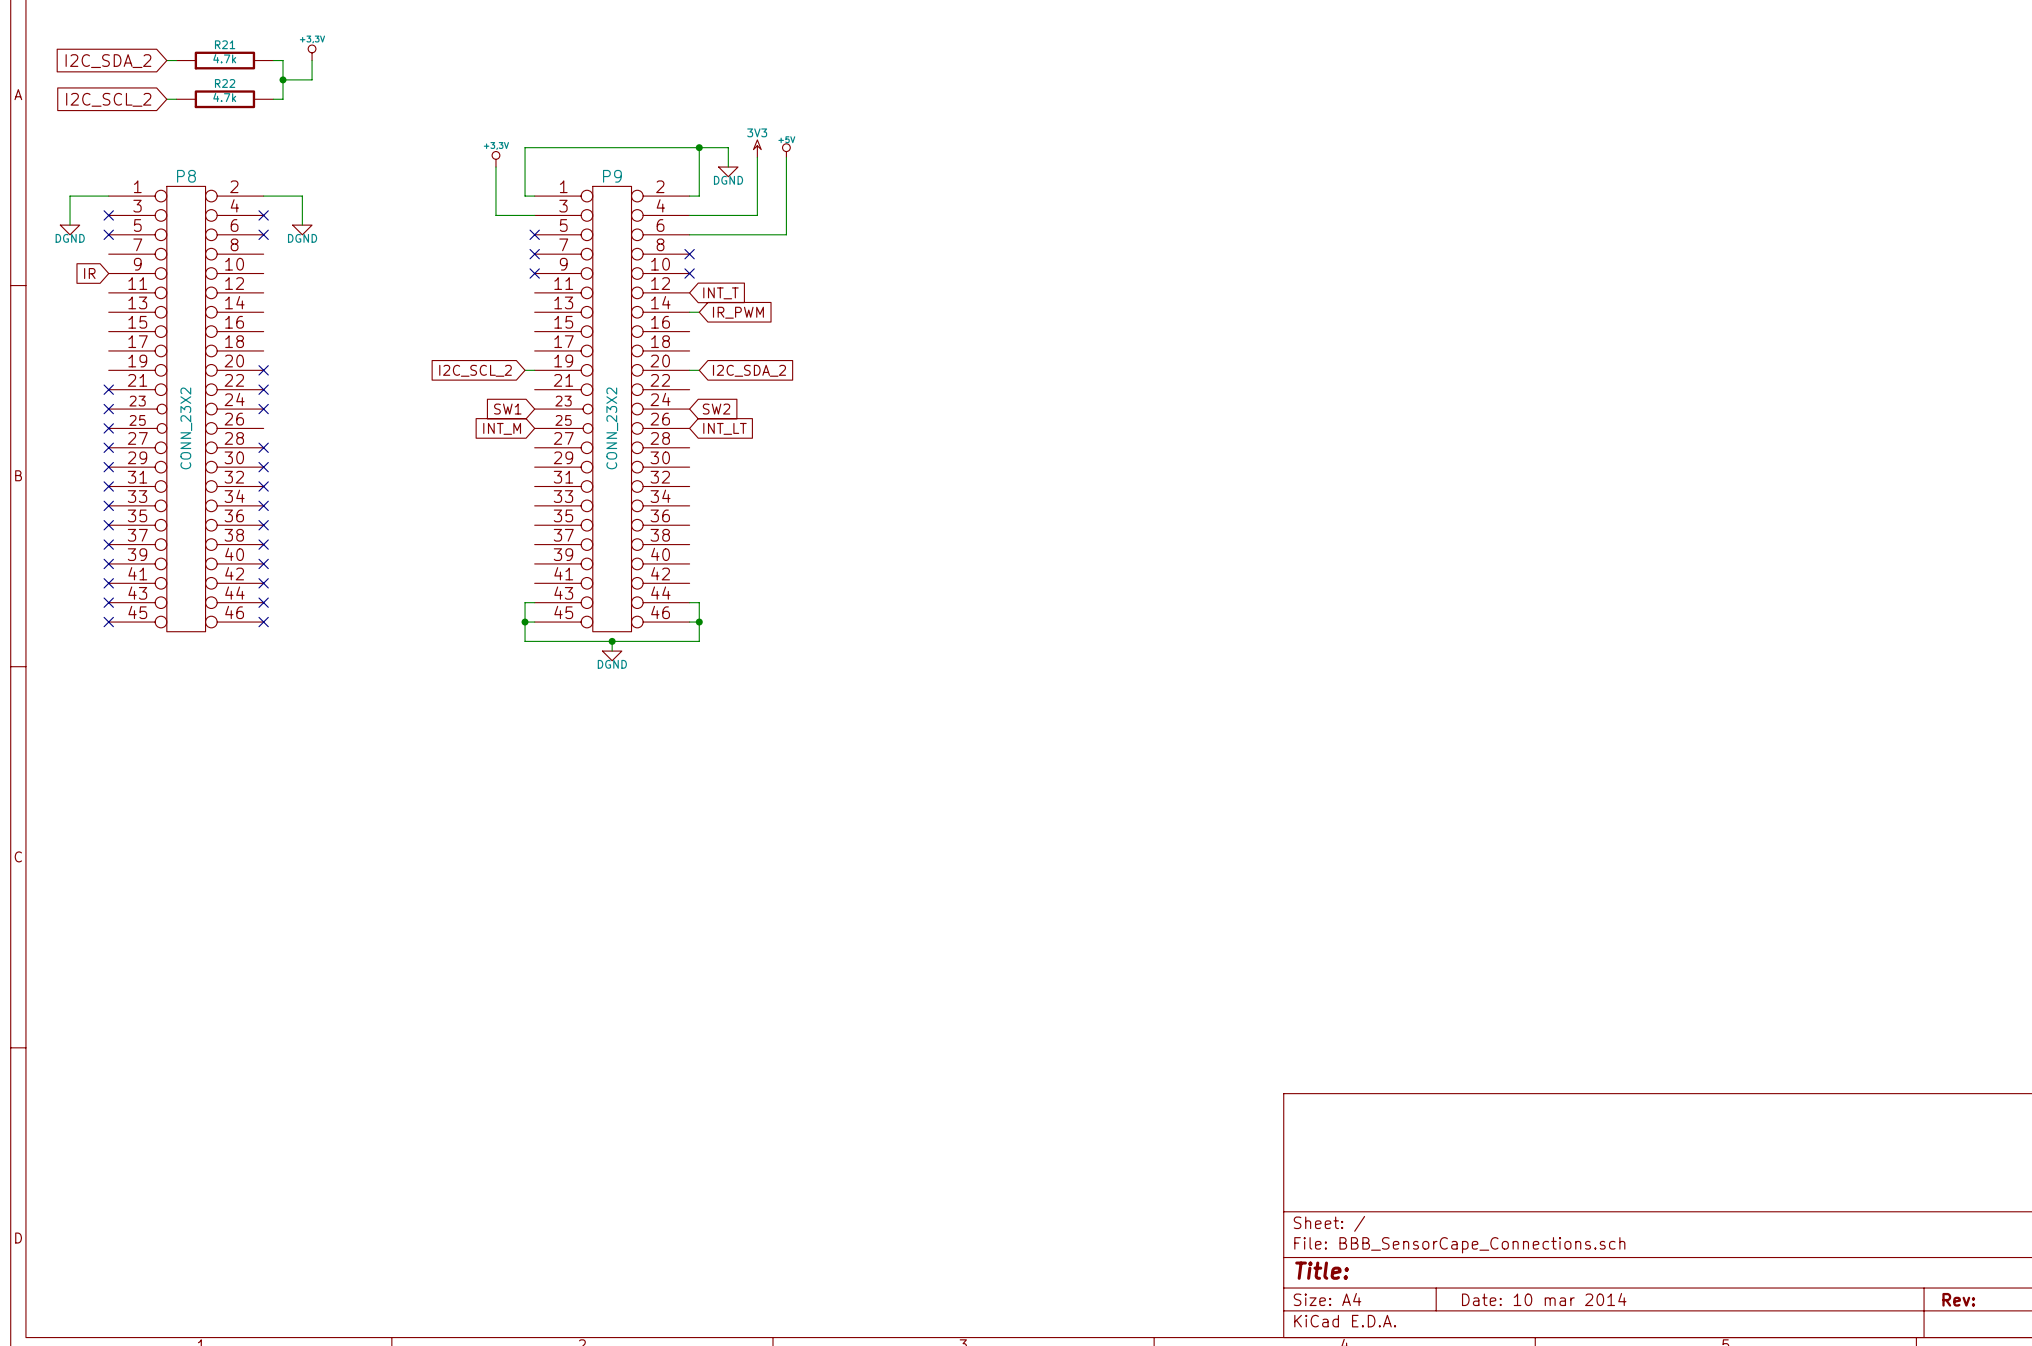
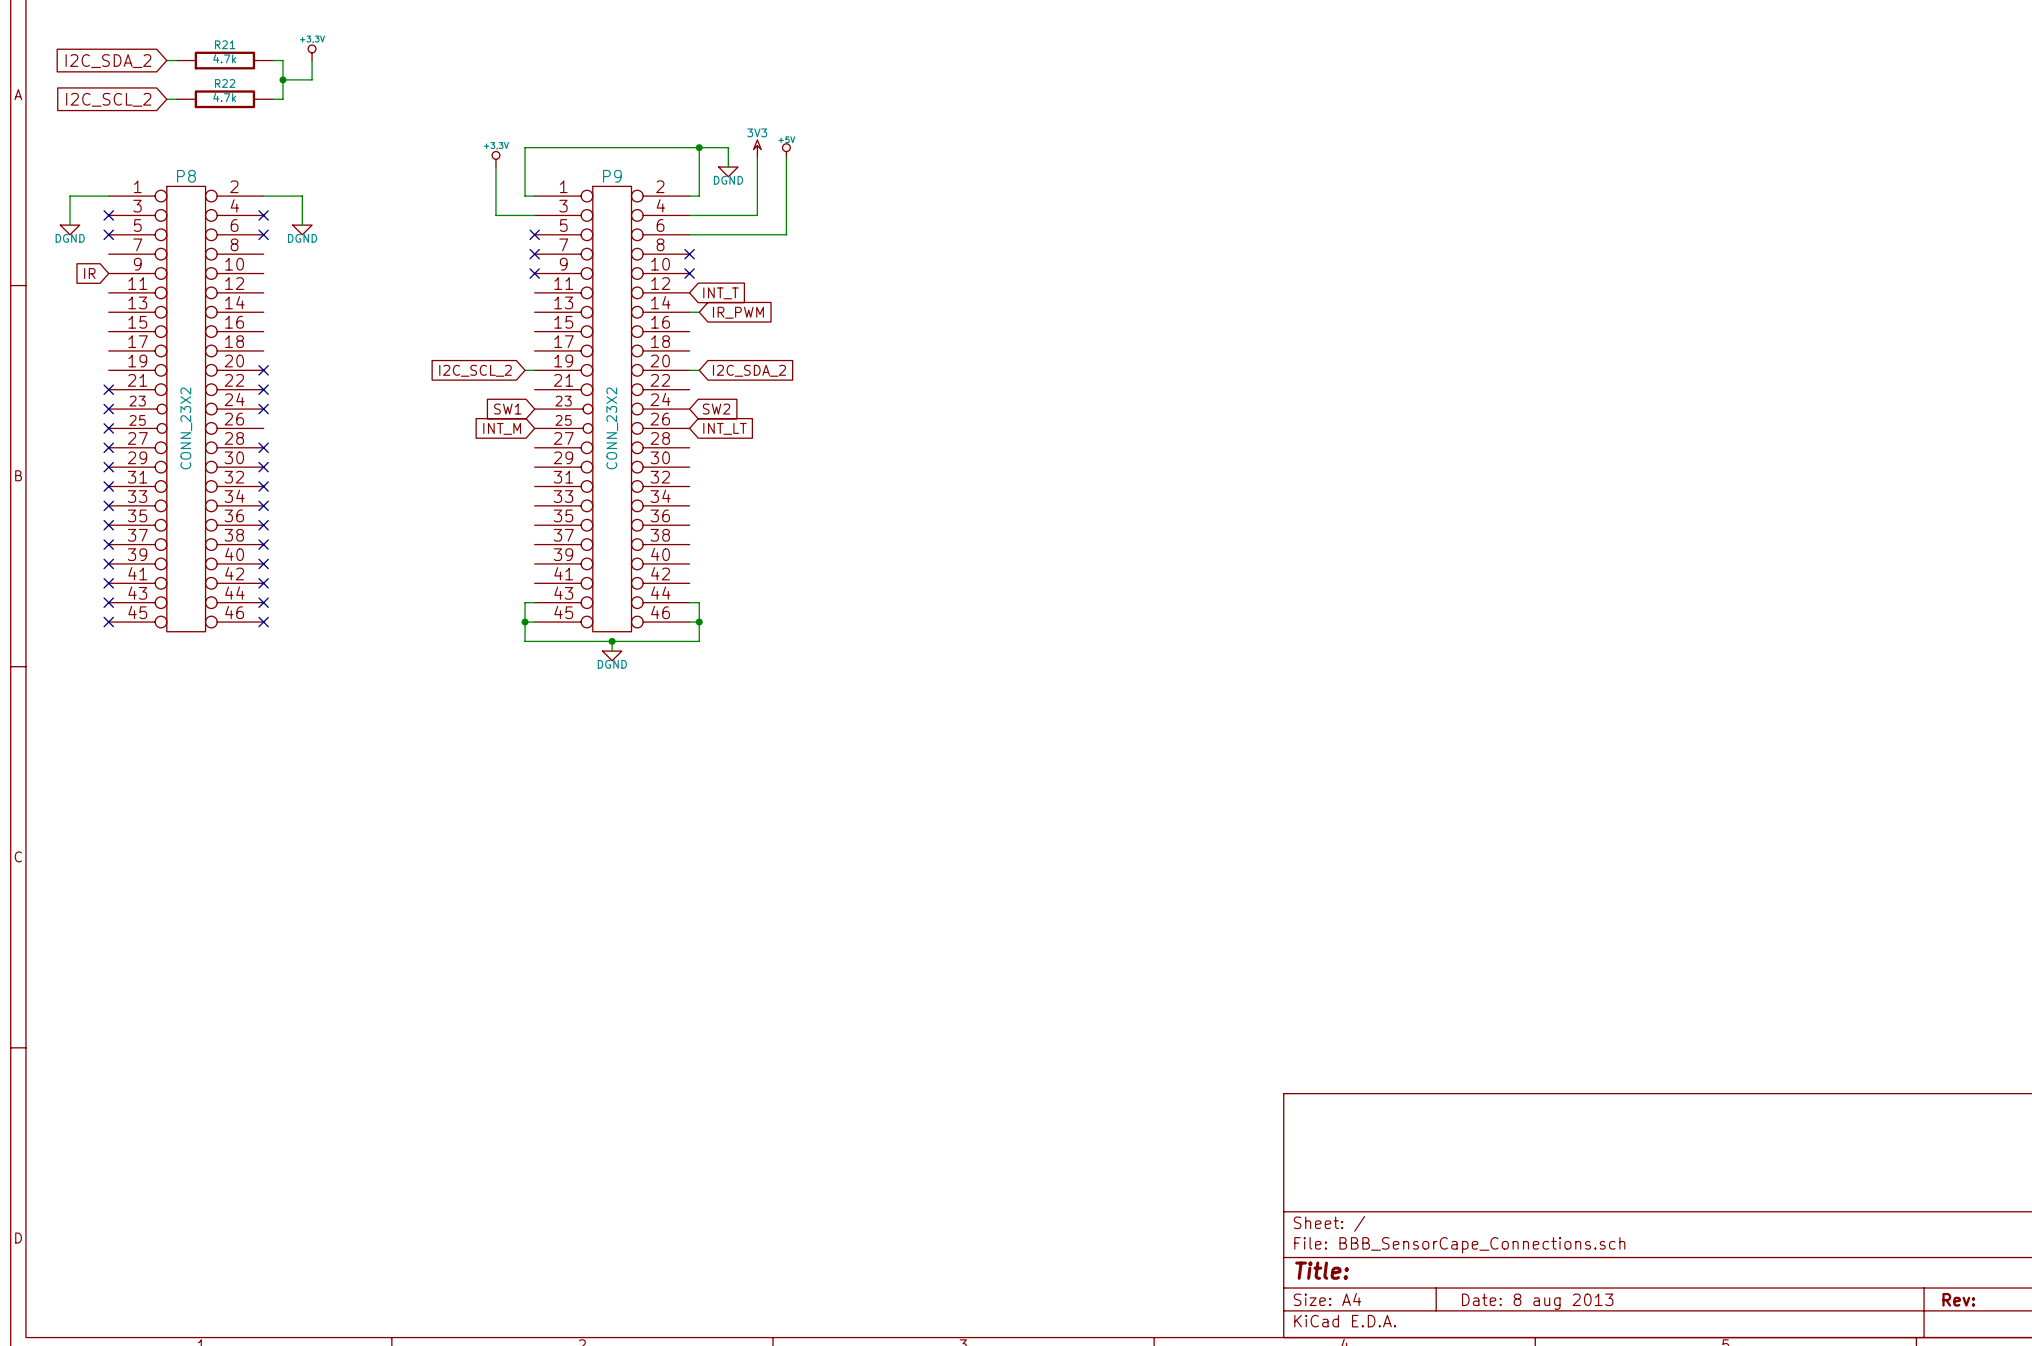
title block: Date: 10 mar 2014 (1544, 1299) -> Date: 8 aug 2013 (1537, 1301)

